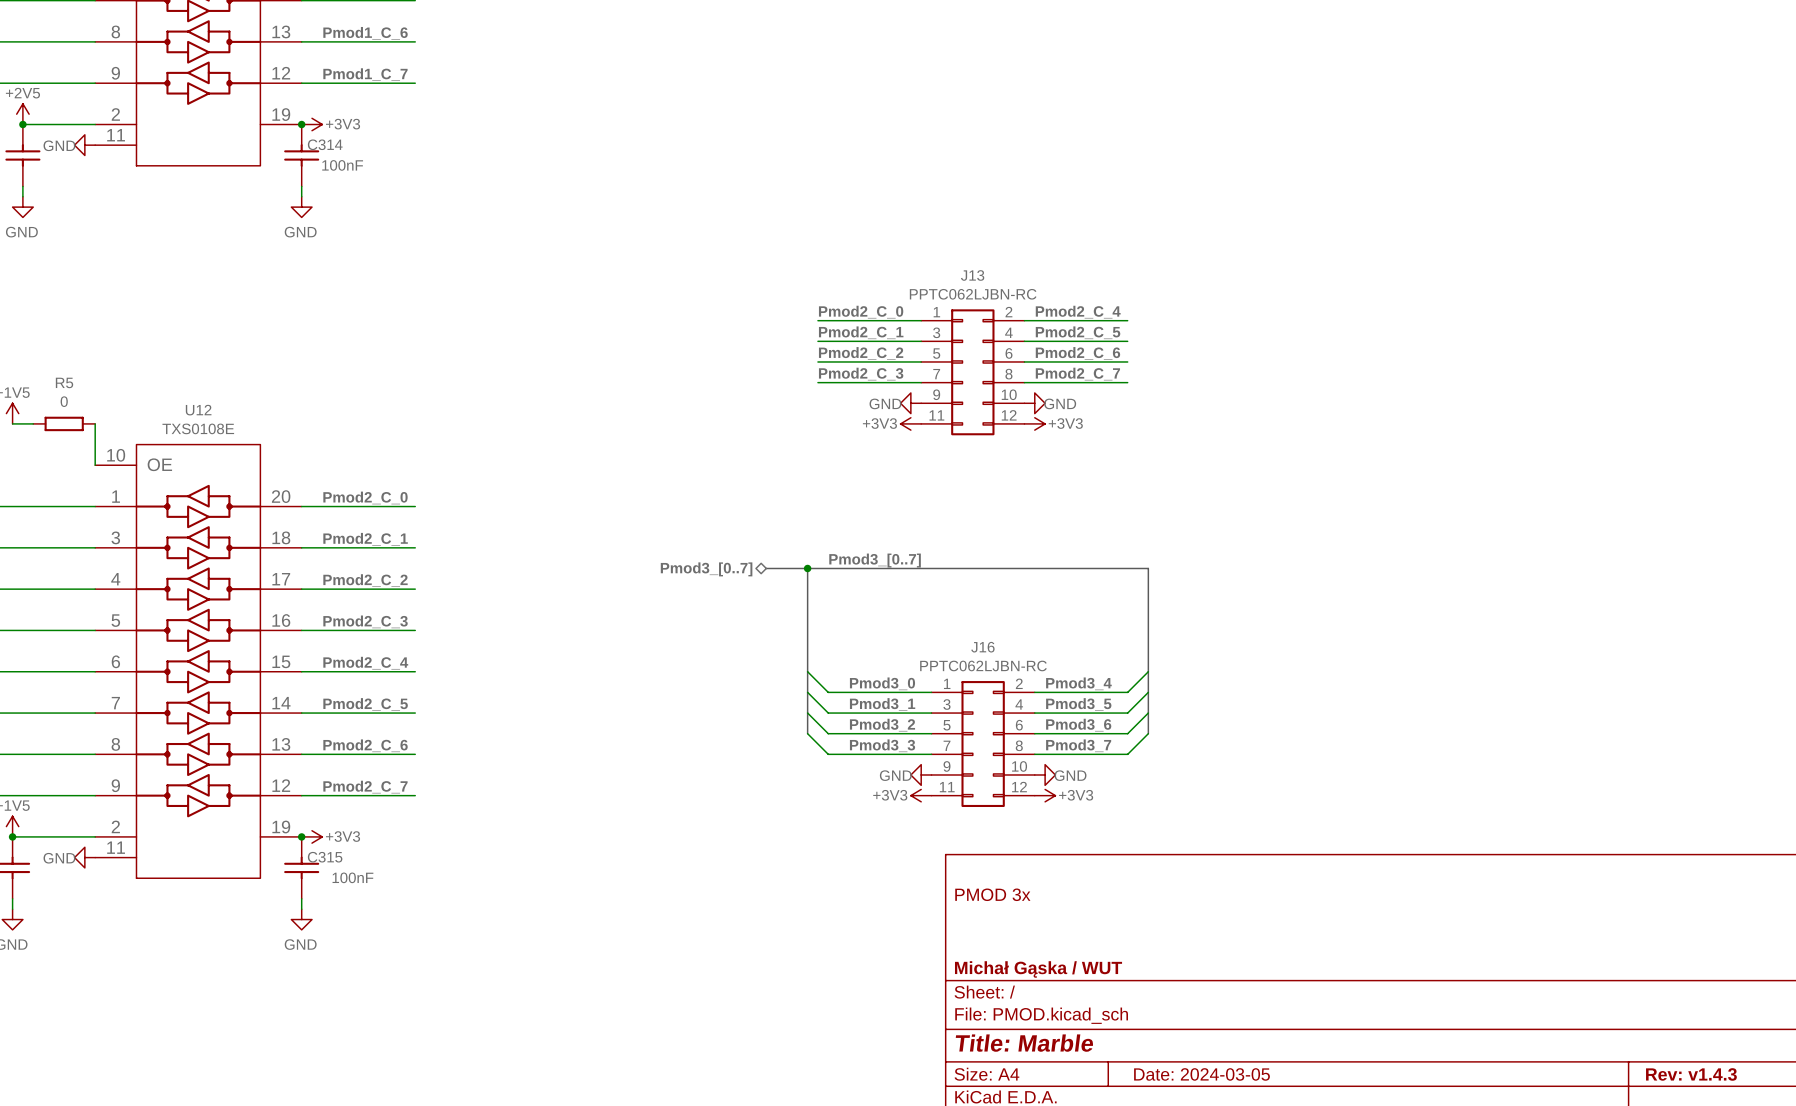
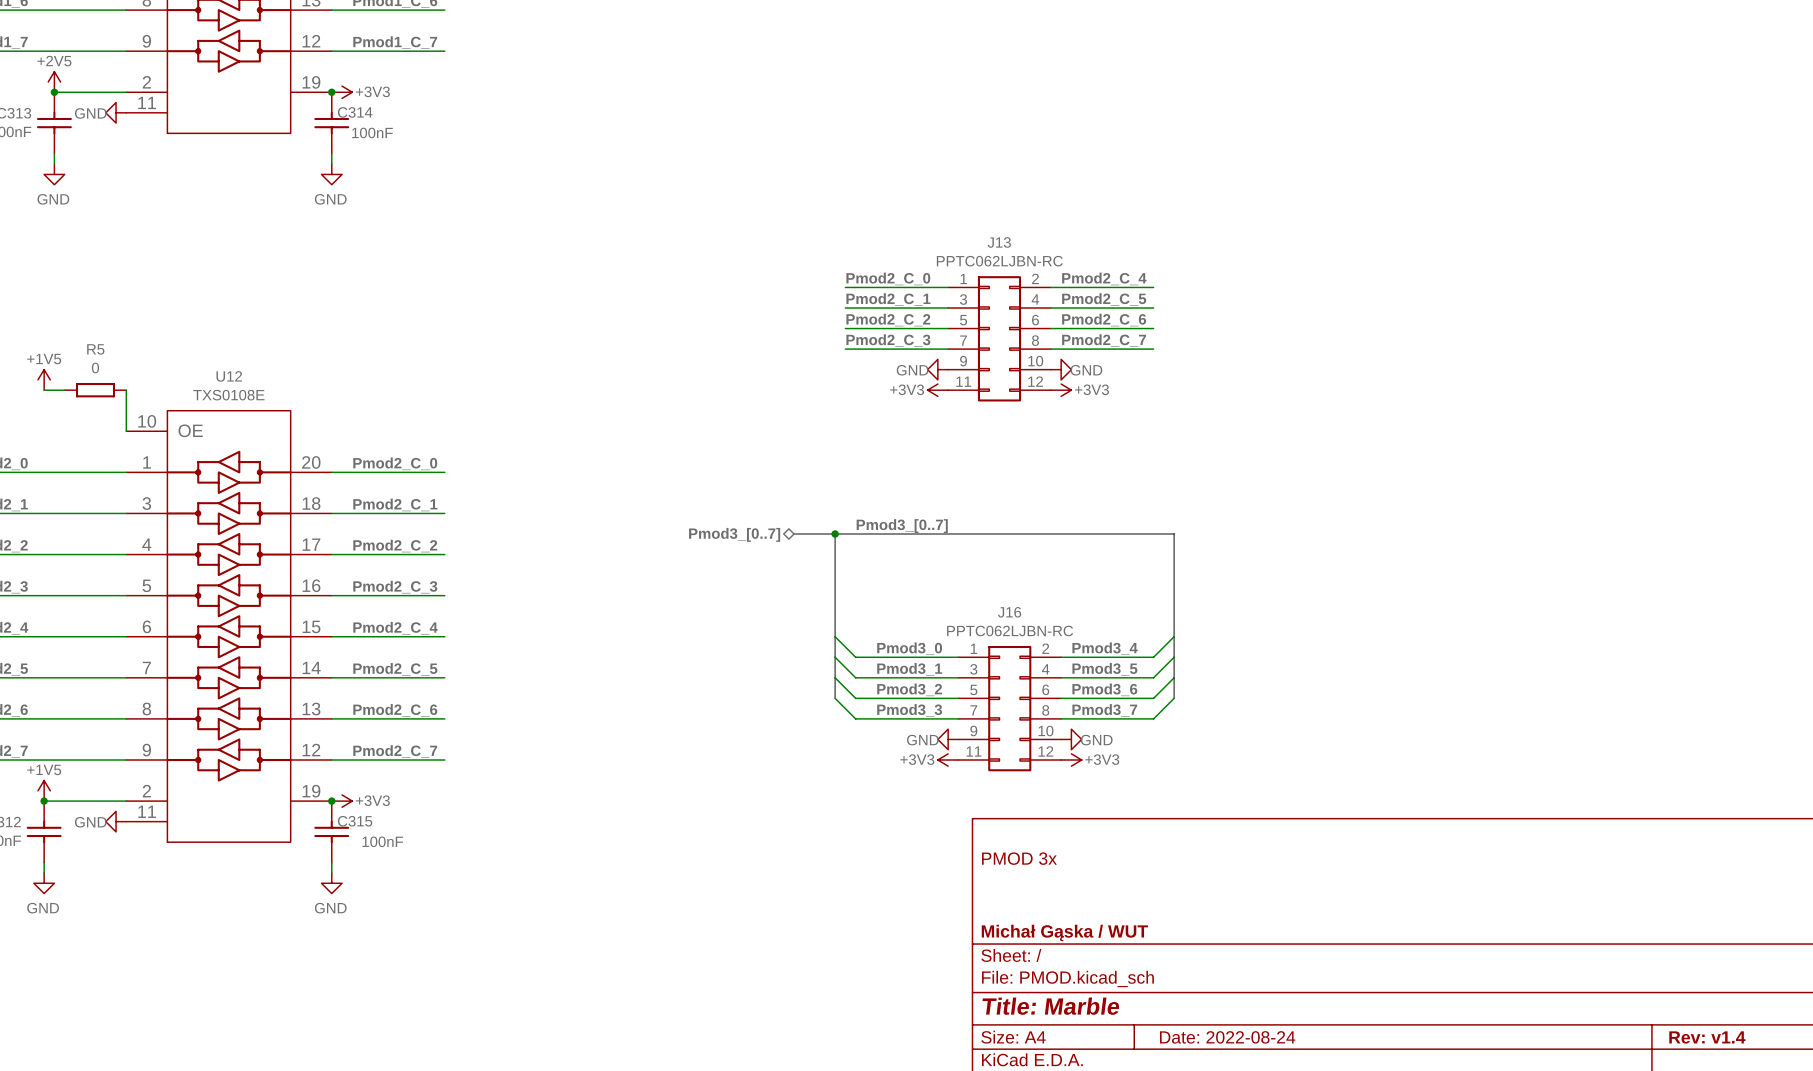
title block: Date: 2024-03-05 (1202, 1074) -> Date: 2022-08-24 (1227, 1037)
title block: Rev: v1.4.3 (1691, 1074) -> Rev: v1.4 (1707, 1037)

